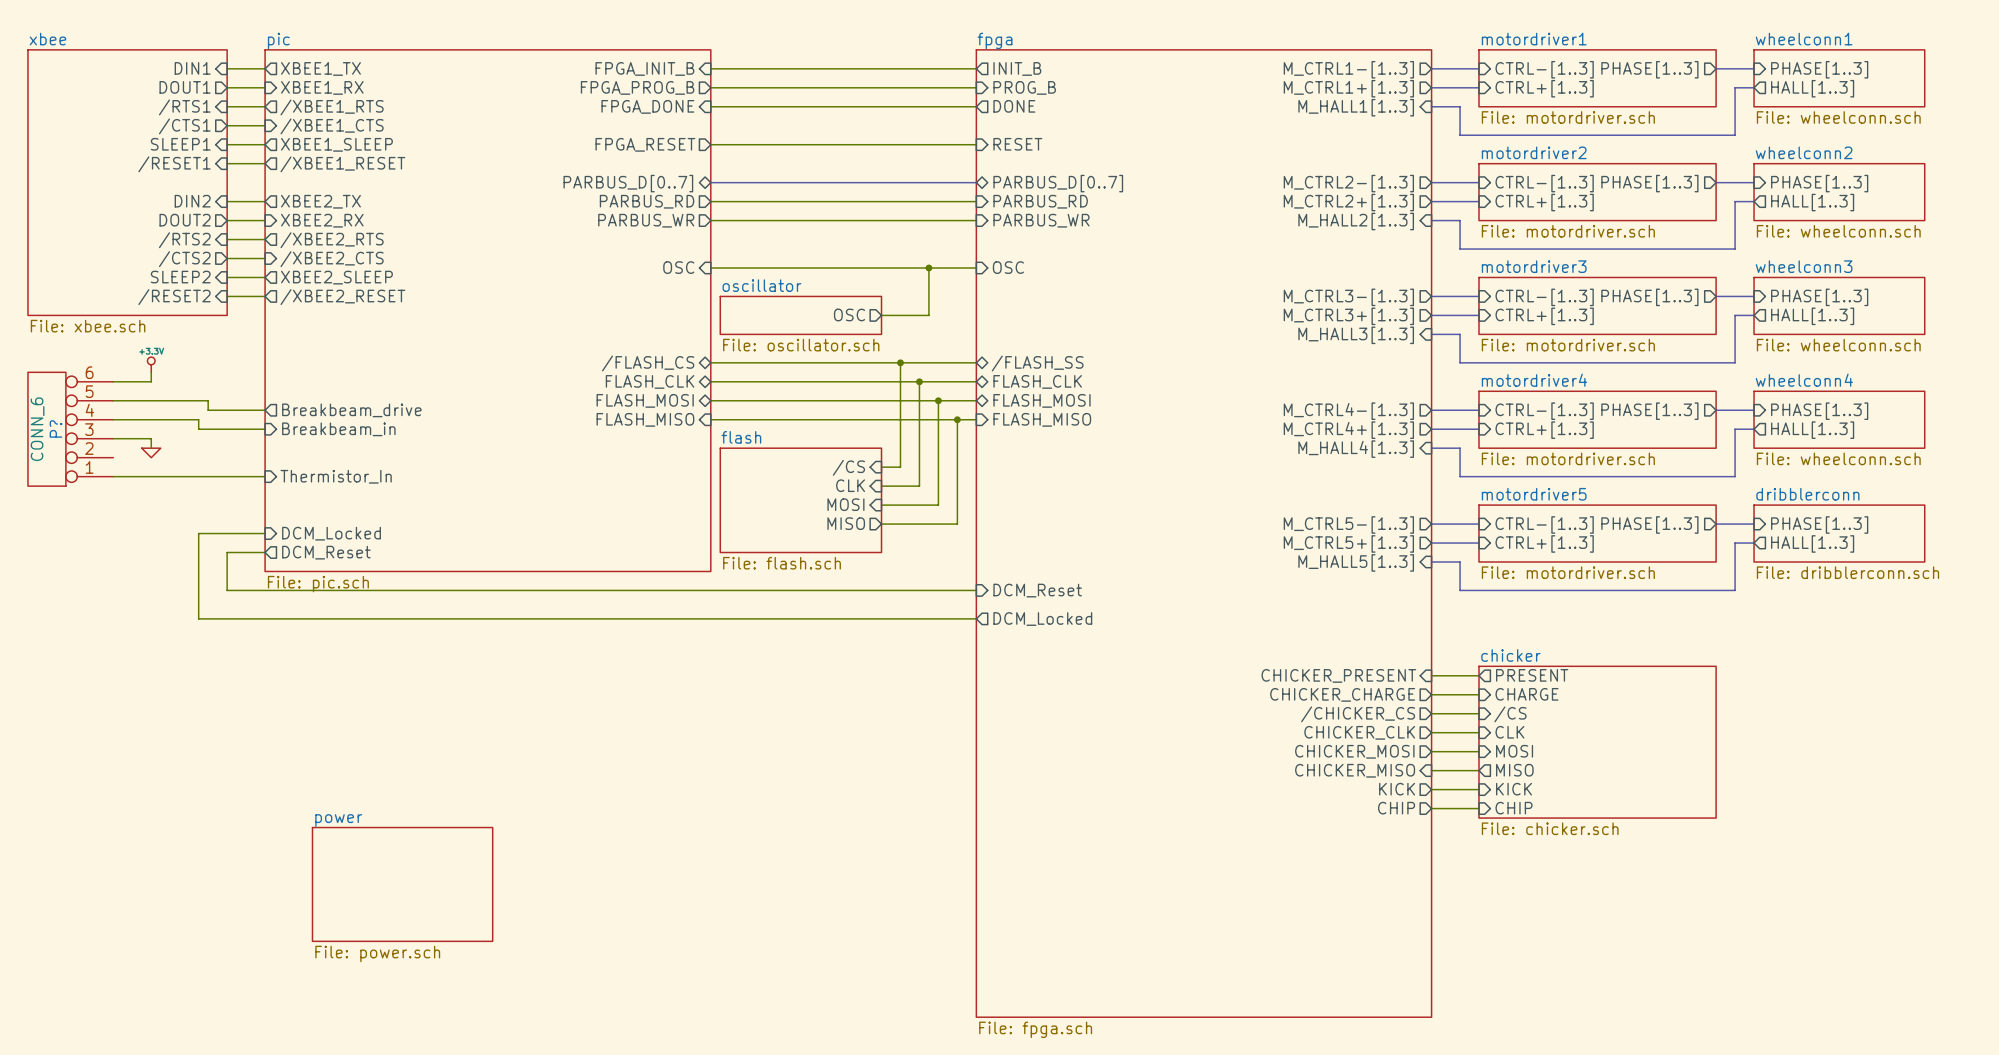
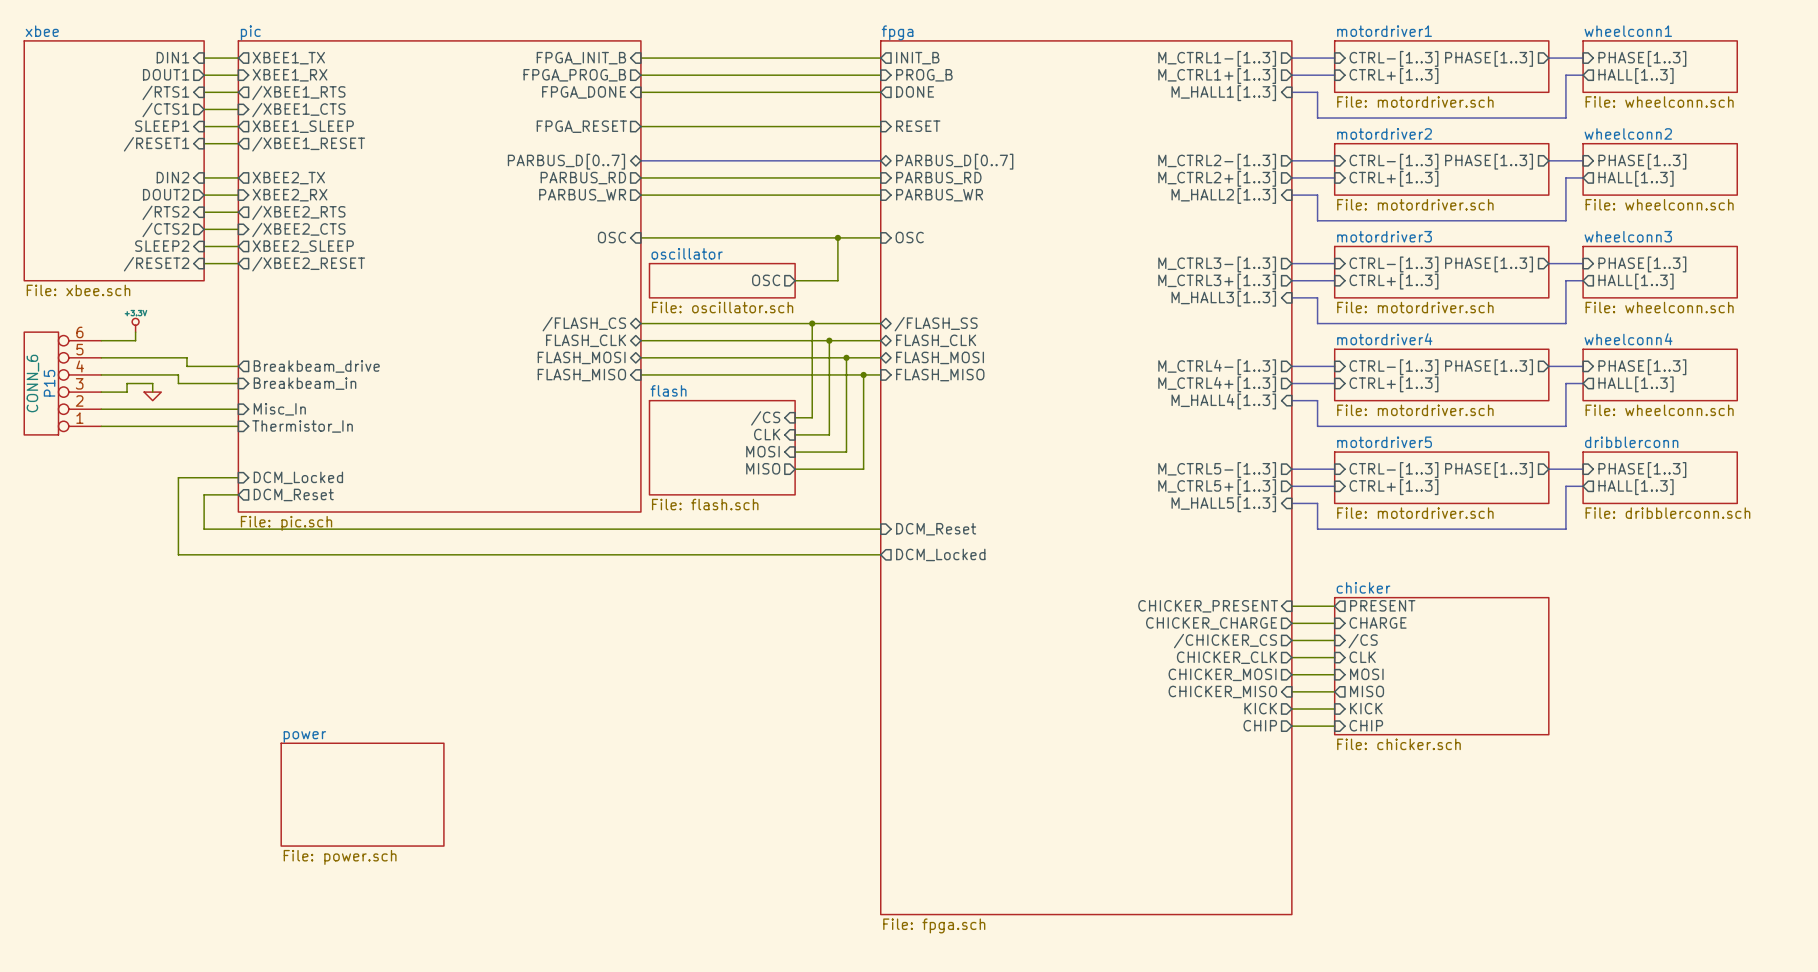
P? name: P? (56, 428) -> P15 (49, 383)
wire: (141, 438) (151, 438) (151, 448) -> (127, 392) (127, 383) (152, 383) (152, 392)
power symbol position: (151, 452) -> (152, 396)
wire: none -> (101, 409) (238, 409)
sheet pin: none -> Misc_In (279, 409)

